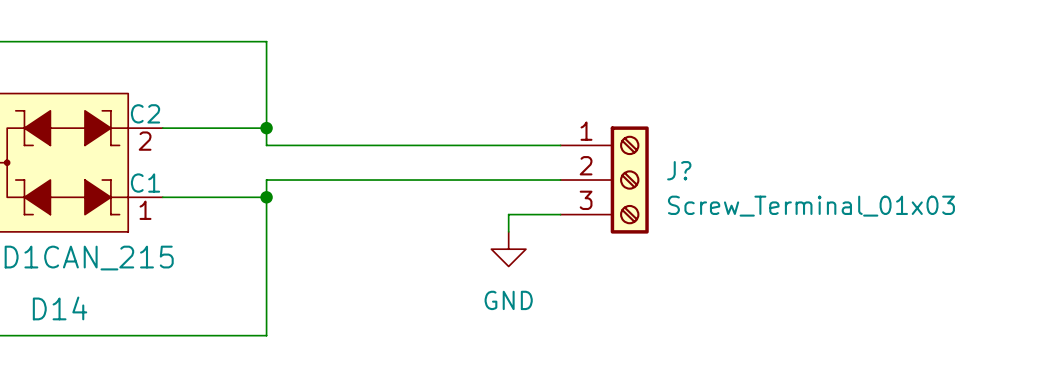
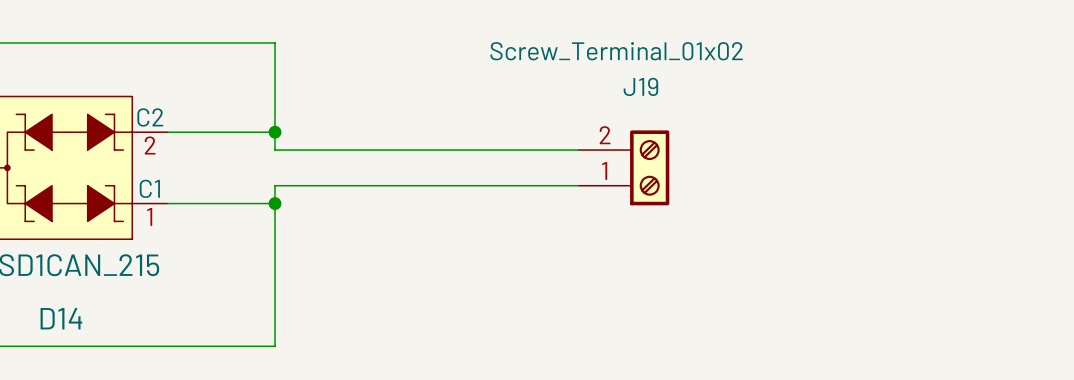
J19: none -> Screw_Terminal_01x02 (623, 167)
J?: Screw_Terminal_01x03 (604, 180) -> none
wire: (560, 214) (508, 214) (508, 231) -> none
power symbol: GND (508, 249) -> none

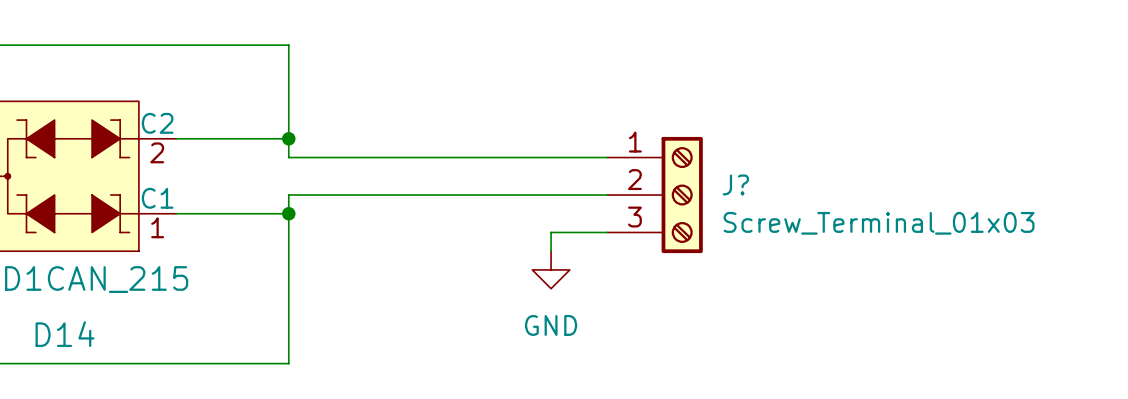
J19: Screw_Terminal_01x02 (623, 167) -> none
J?: none -> Screw_Terminal_01x03 (655, 195)
wire: none -> (607, 232) (551, 232) (551, 251)
power symbol: none -> GND (551, 269)

